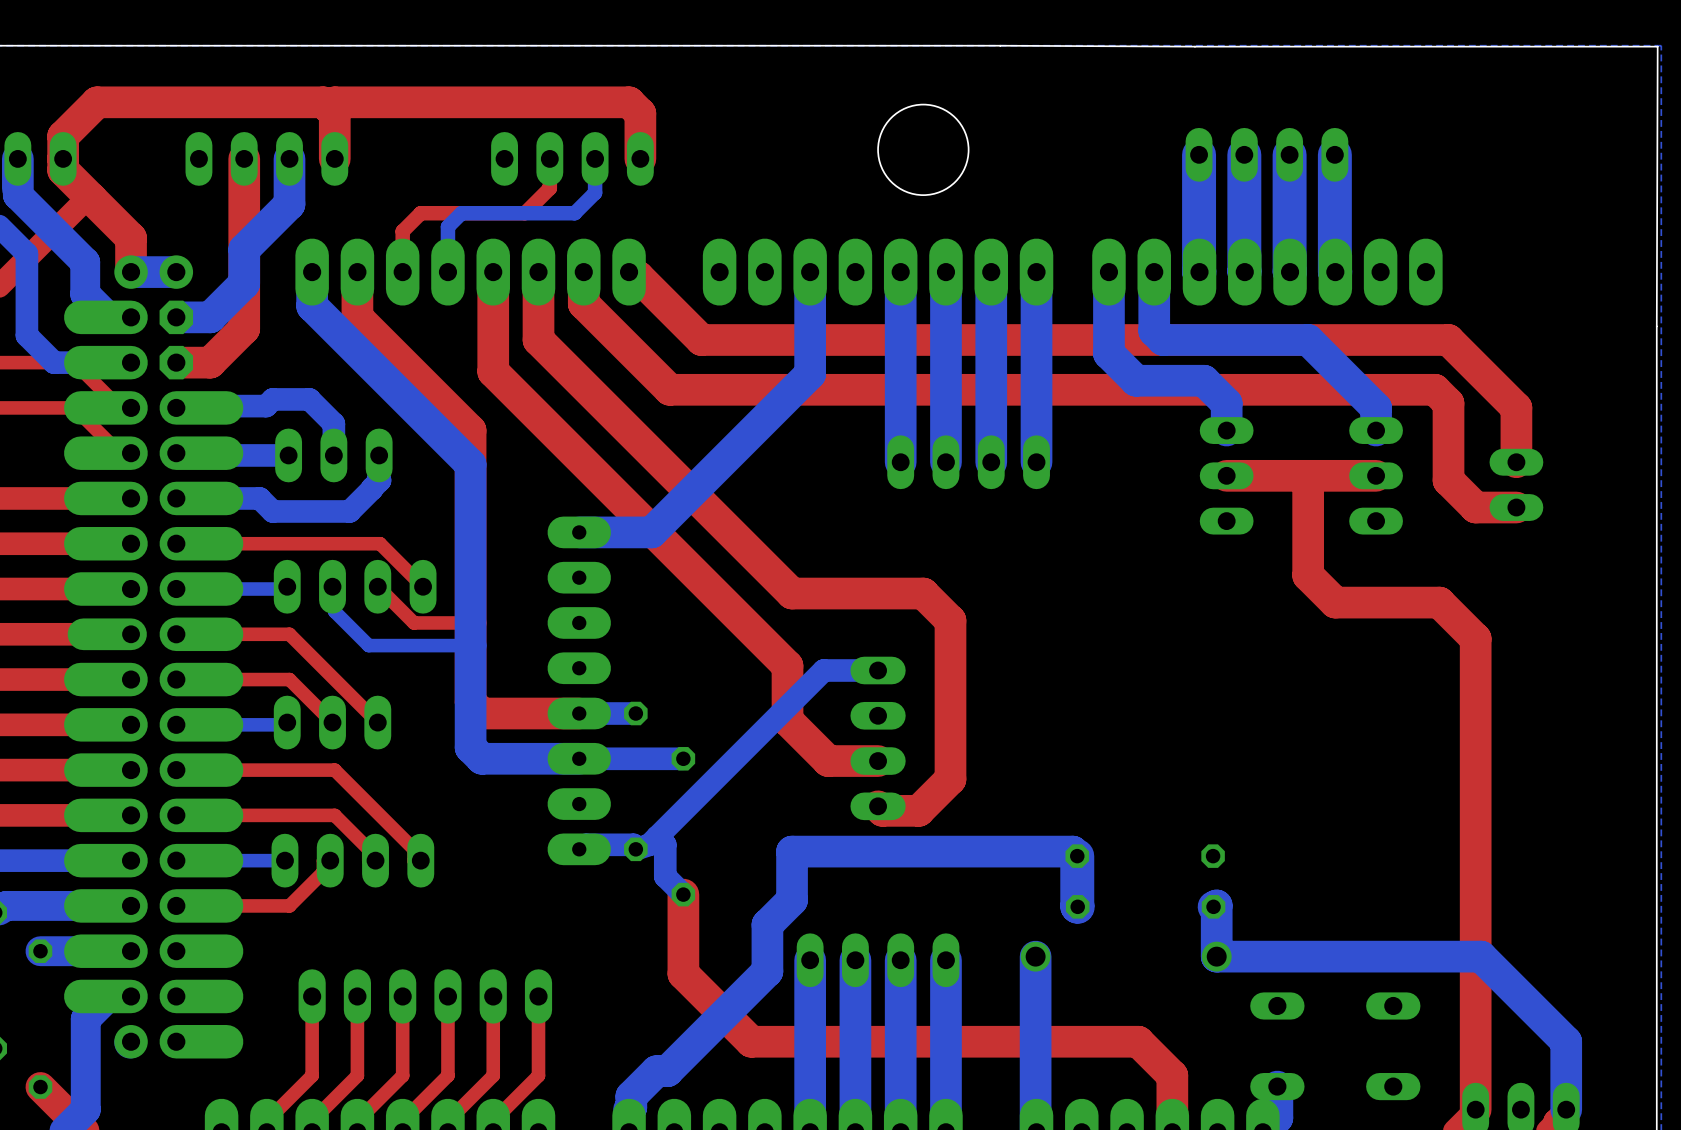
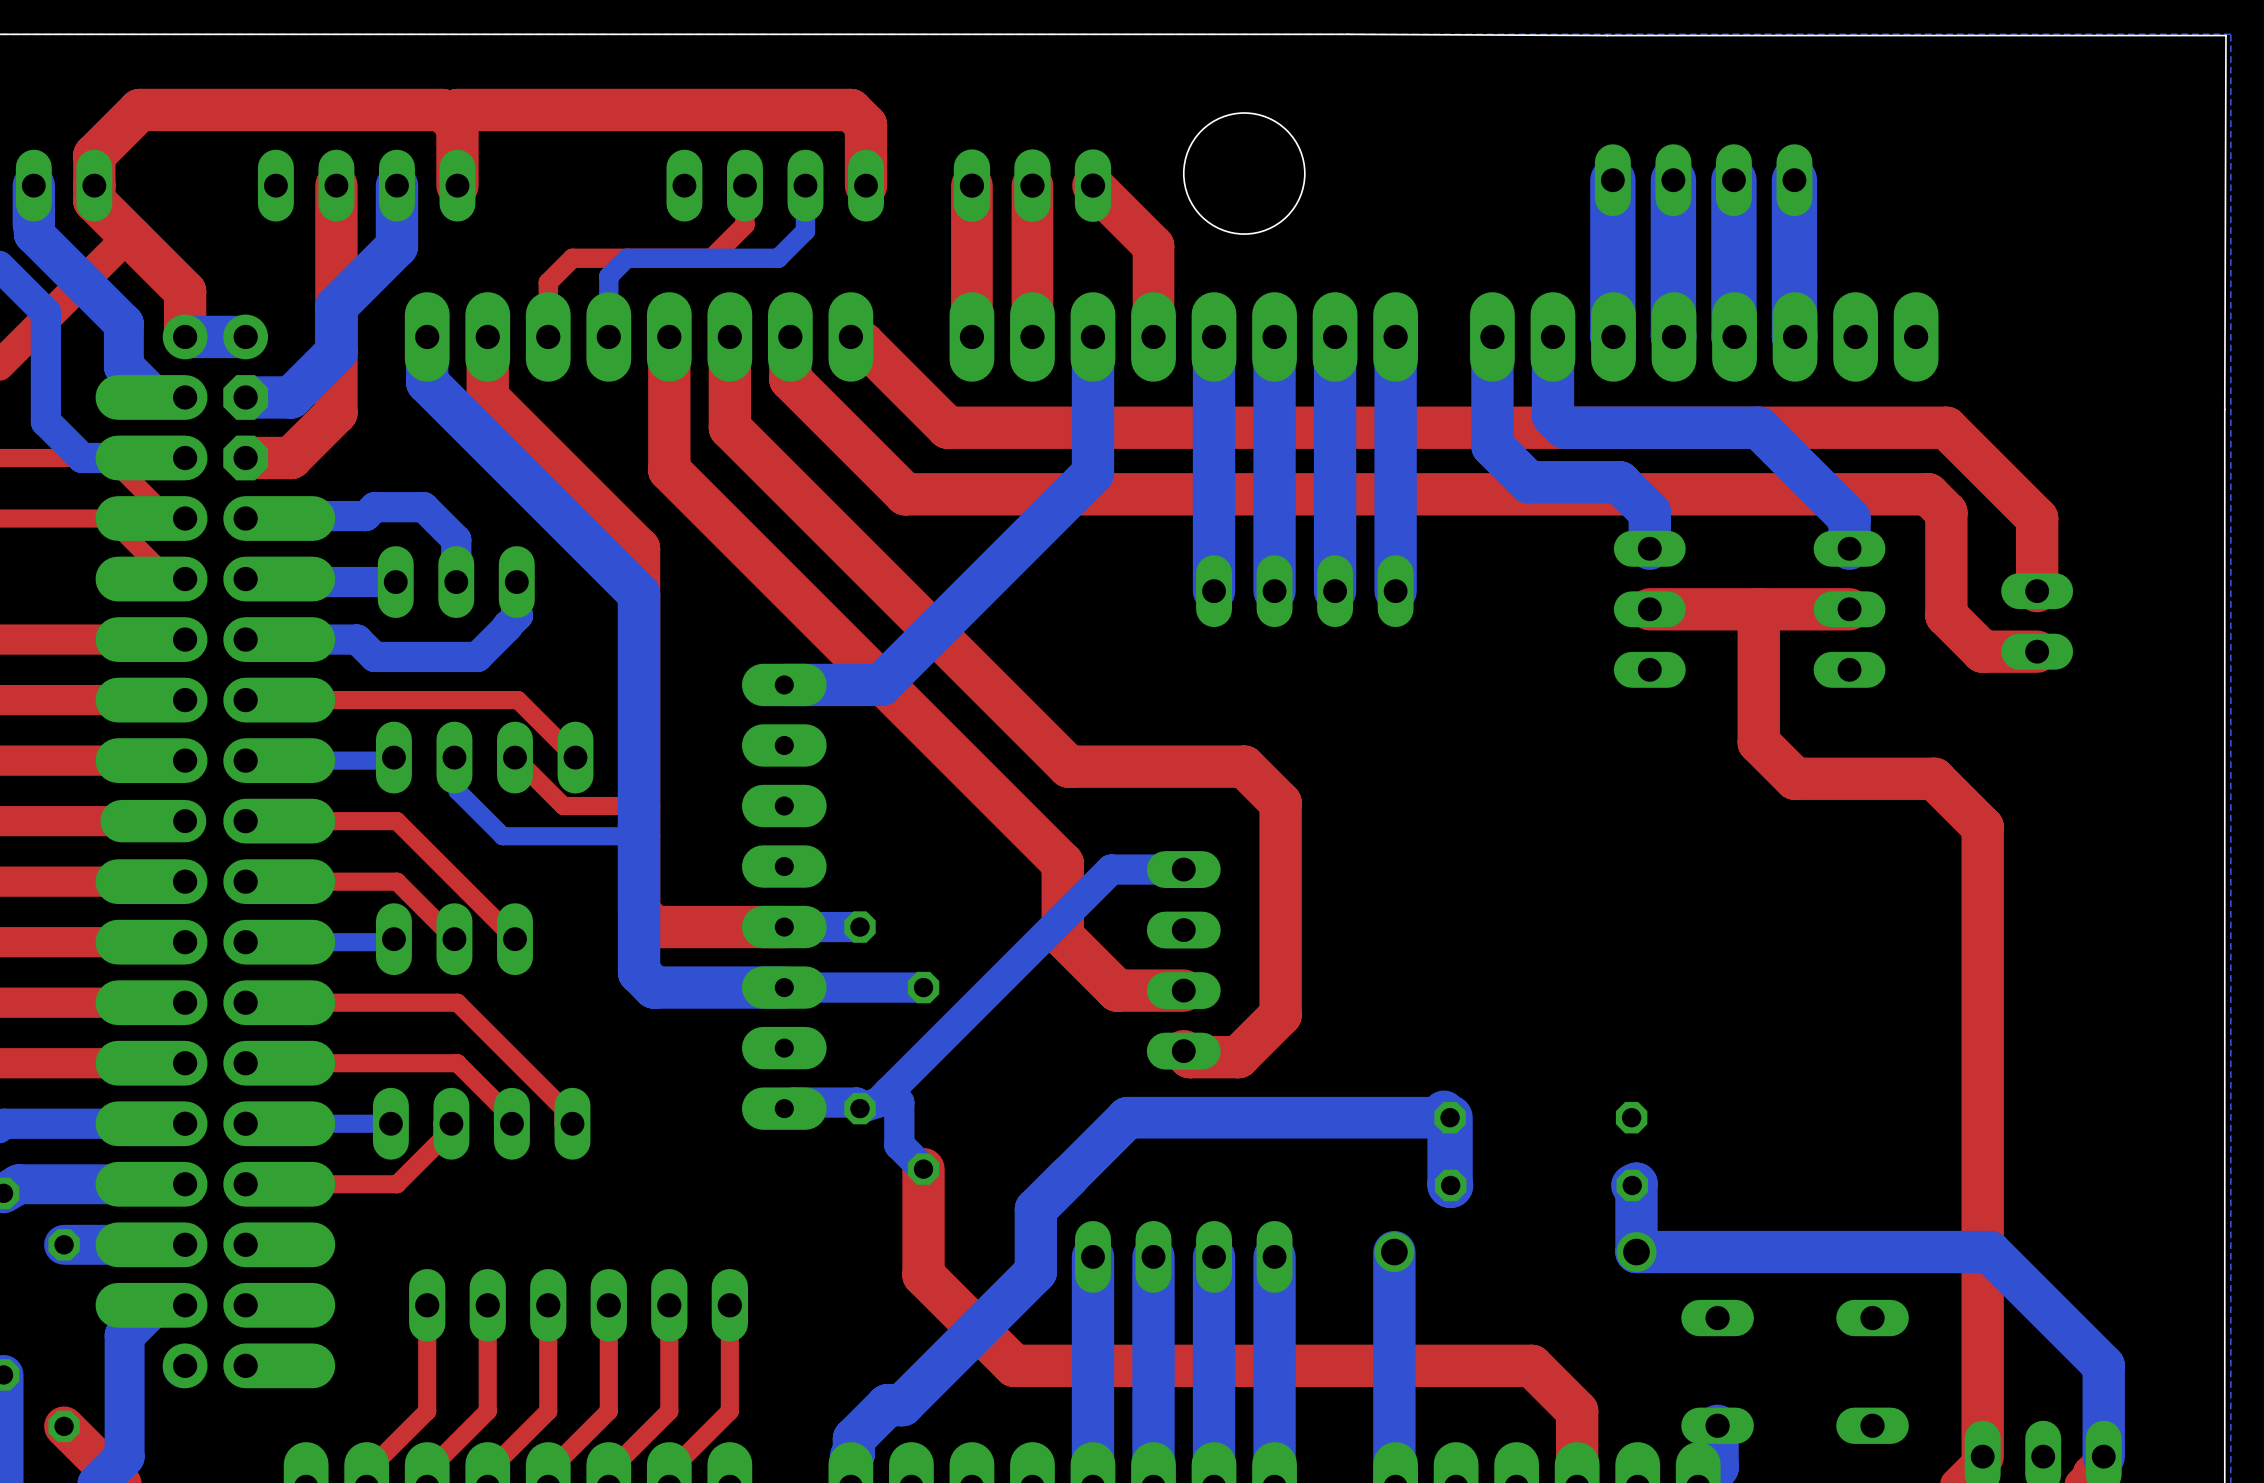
top track: none -> (971, 185) (971, 336)
top track: none -> (1032, 185) (1032, 336)
part: none -> (1032, 185)
top track: none -> (1092, 185) (1153, 246) (1153, 336)
bottom track: (1072, 851) (792, 851) (792, 900) -> (1450, 1117) (1127, 1117) (1068, 1176)

